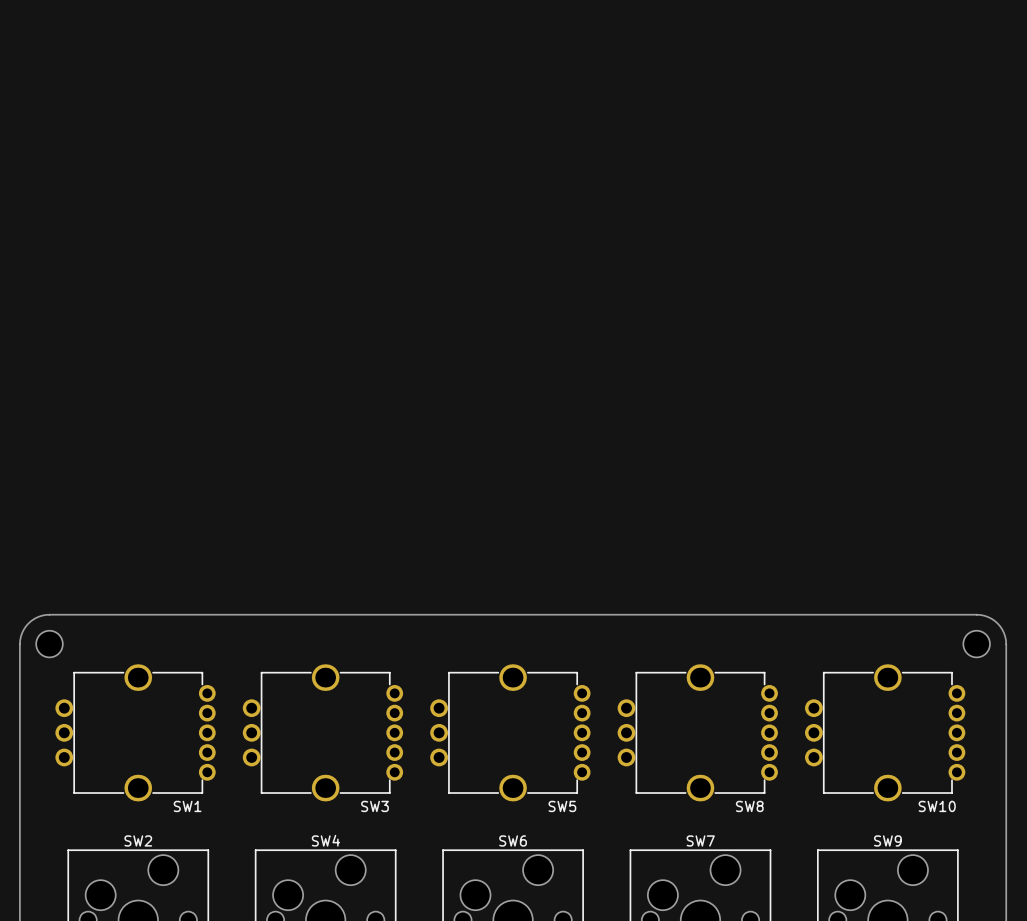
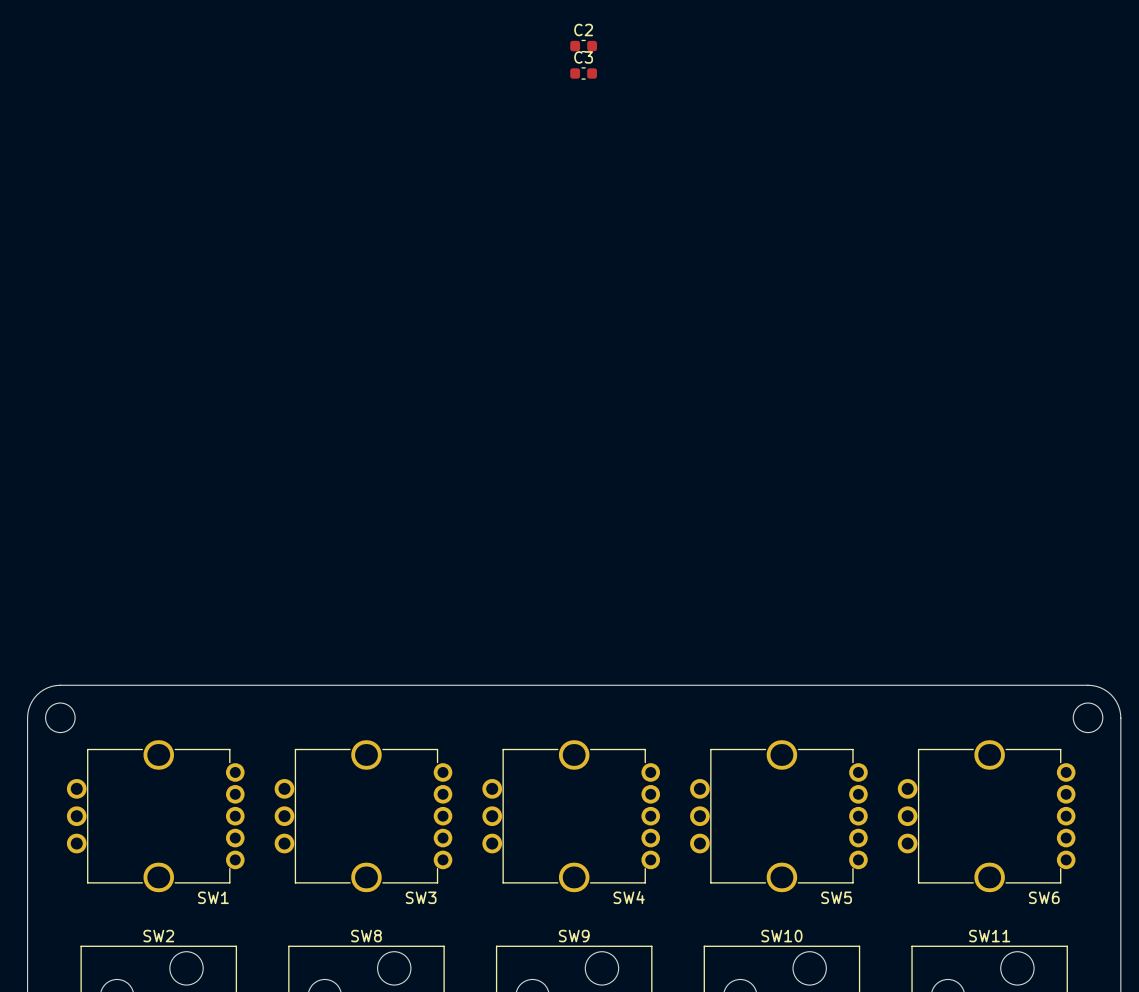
C2: none -> (583, 46)
C3: none -> (583, 73)
SW5 name: SW5 (562, 806) -> SW4 (629, 897)
SW8 name: SW8 (749, 806) -> SW5 (836, 897)
SW10 name: SW10 (937, 806) -> SW6 (1044, 897)
SW4 name: SW4 (325, 840) -> SW8 (366, 936)
SW6 name: SW6 (513, 840) -> SW9 (574, 936)
SW7 name: SW7 (700, 840) -> SW10 (781, 936)
SW9 name: SW9 (887, 840) -> SW11 (989, 936)

